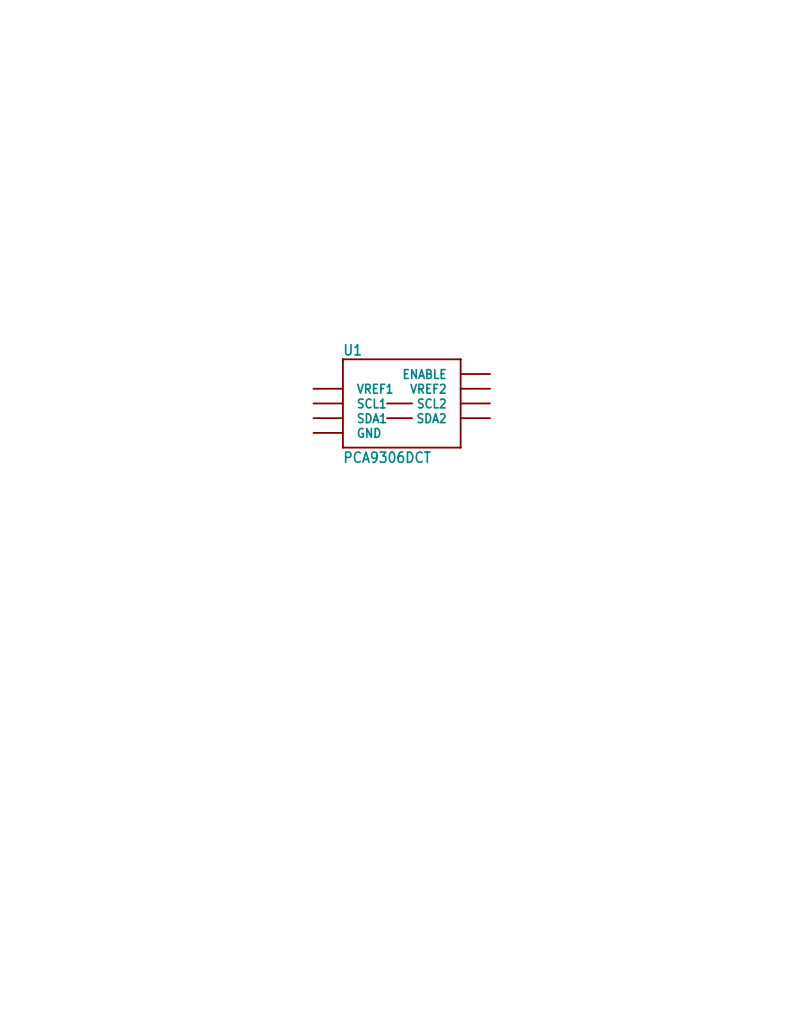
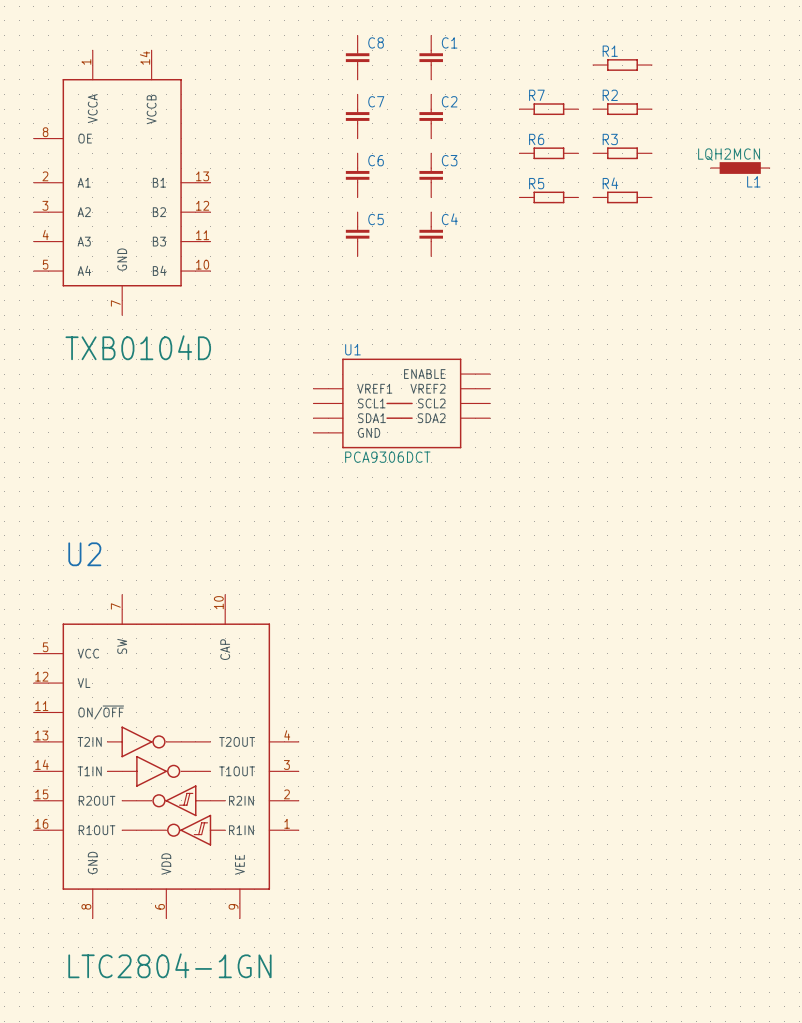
C8: none -> (357, 57)
C1: none -> (431, 57)
R1: none -> (622, 65)
R7: none -> (548, 109)
R2: none -> (622, 109)
C7: none -> (357, 116)
C2: none -> (431, 116)
R6: none -> (548, 153)
R3: none -> (622, 153)
L1: none -> LQH2MCN (740, 168)
C6: none -> (357, 175)
C3: none -> (431, 175)
part: none -> TXB0104D (122, 182)
R5: none -> (548, 197)
R4: none -> (622, 197)
C5: none -> (357, 234)
C4: none -> (431, 234)
U2: none -> LTC2804-1GN (166, 756)

